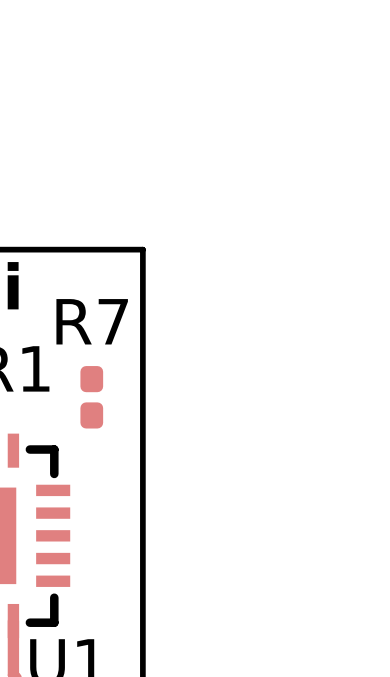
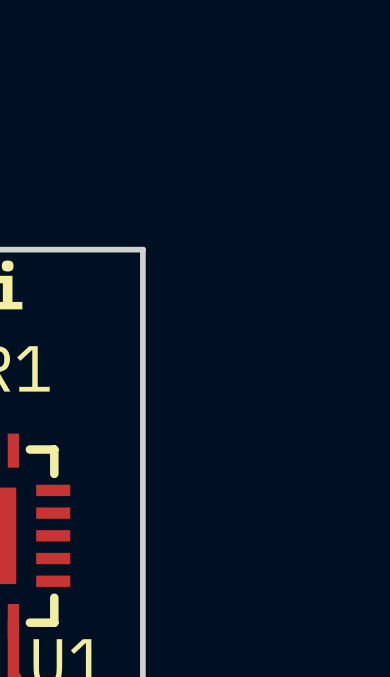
R7: (91, 397) -> none

